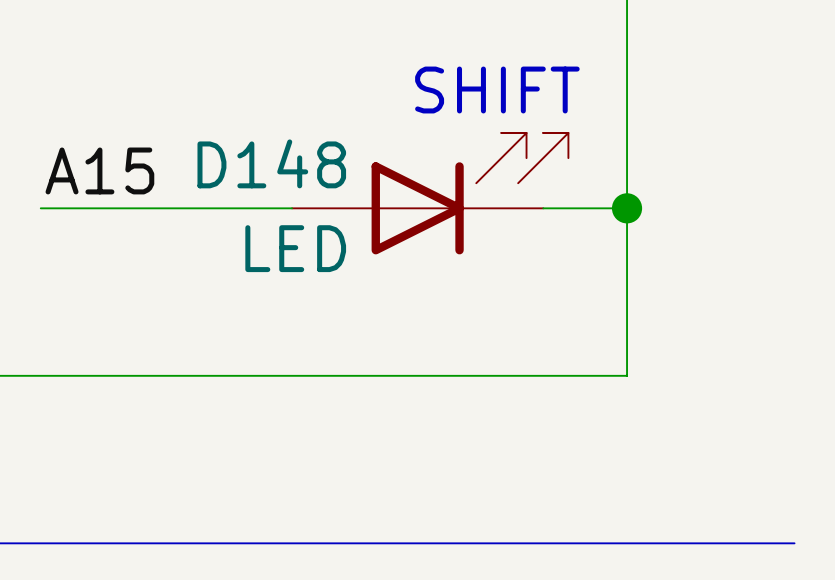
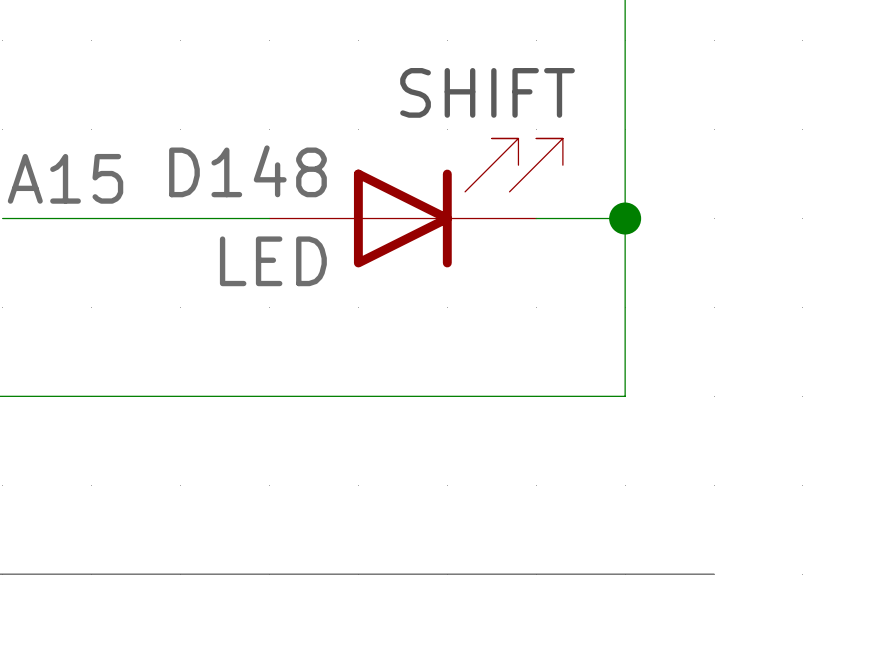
line: (710, 543) (794, 543) -> none

